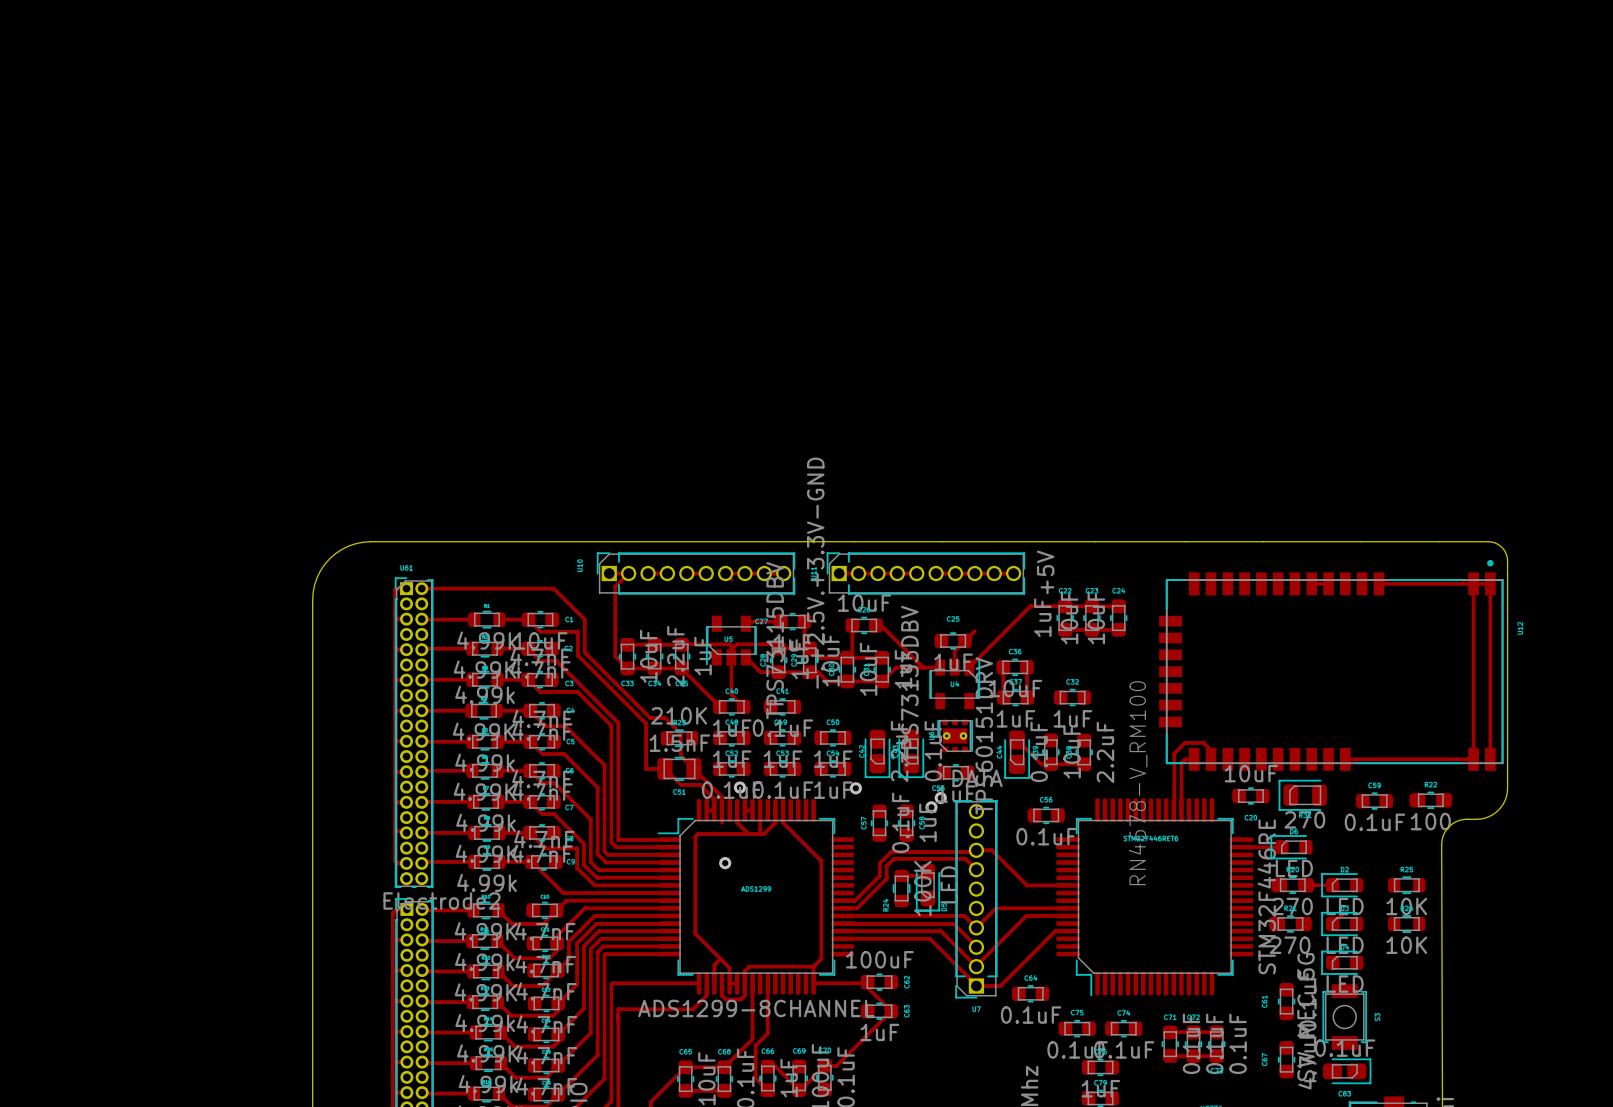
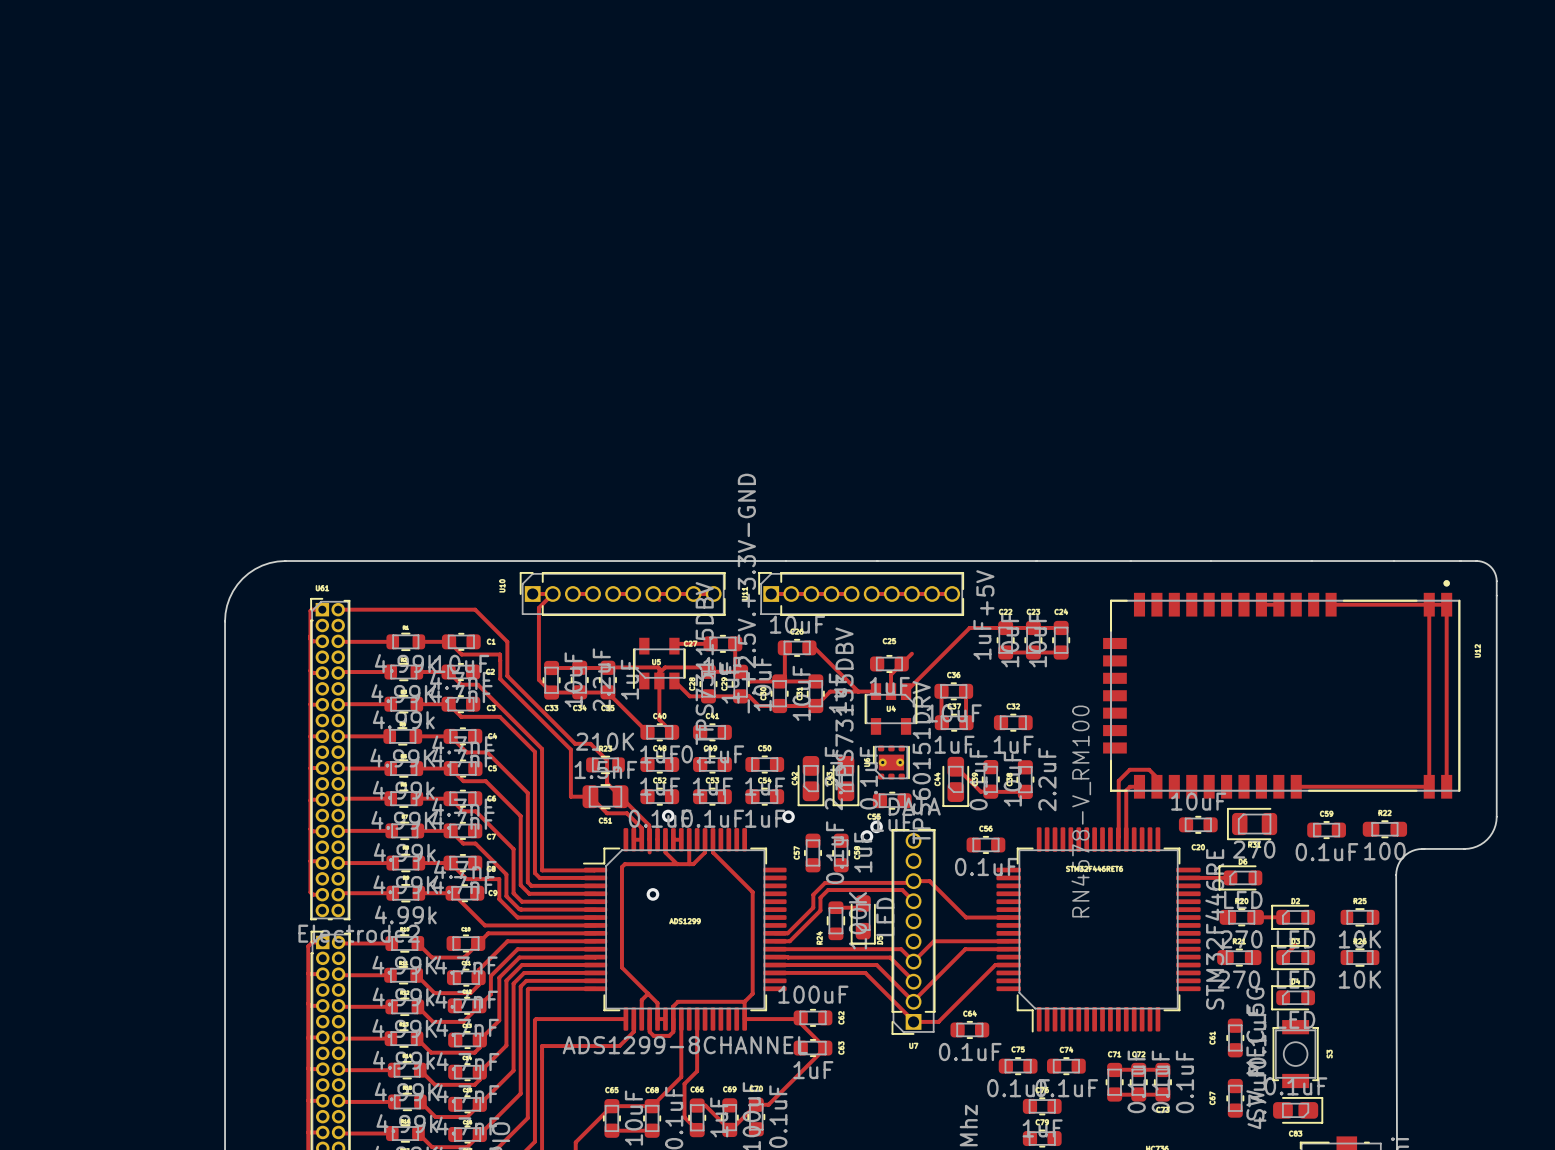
board edge: (1488, 541) (1501, 547) (1507, 558) (1507, 788) (1505, 800) (1498, 810) (1488, 816) (1476, 819) -> (1444, 561) (1481, 561) (1490, 566) (1496, 575) (1496, 816) (1492, 832) (1480, 844) (1468, 848) (1432, 848)

